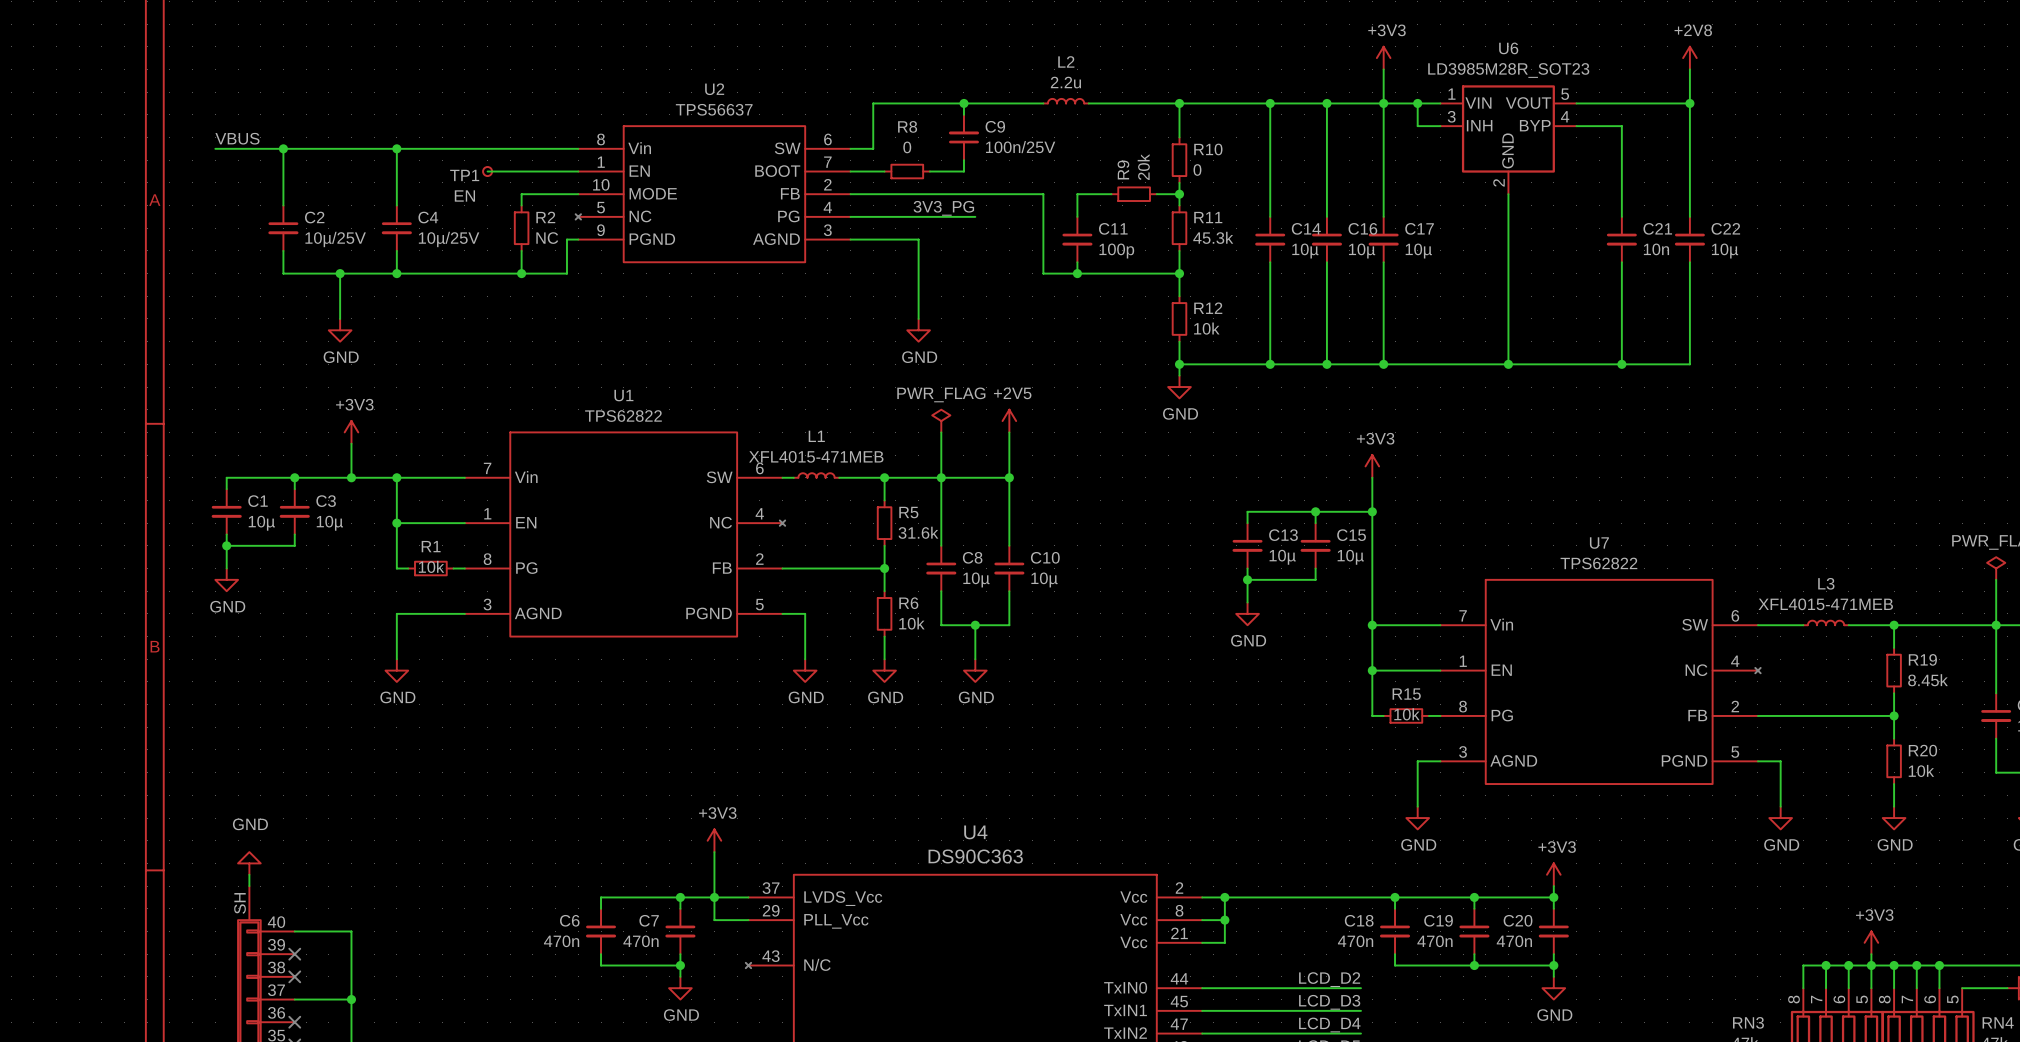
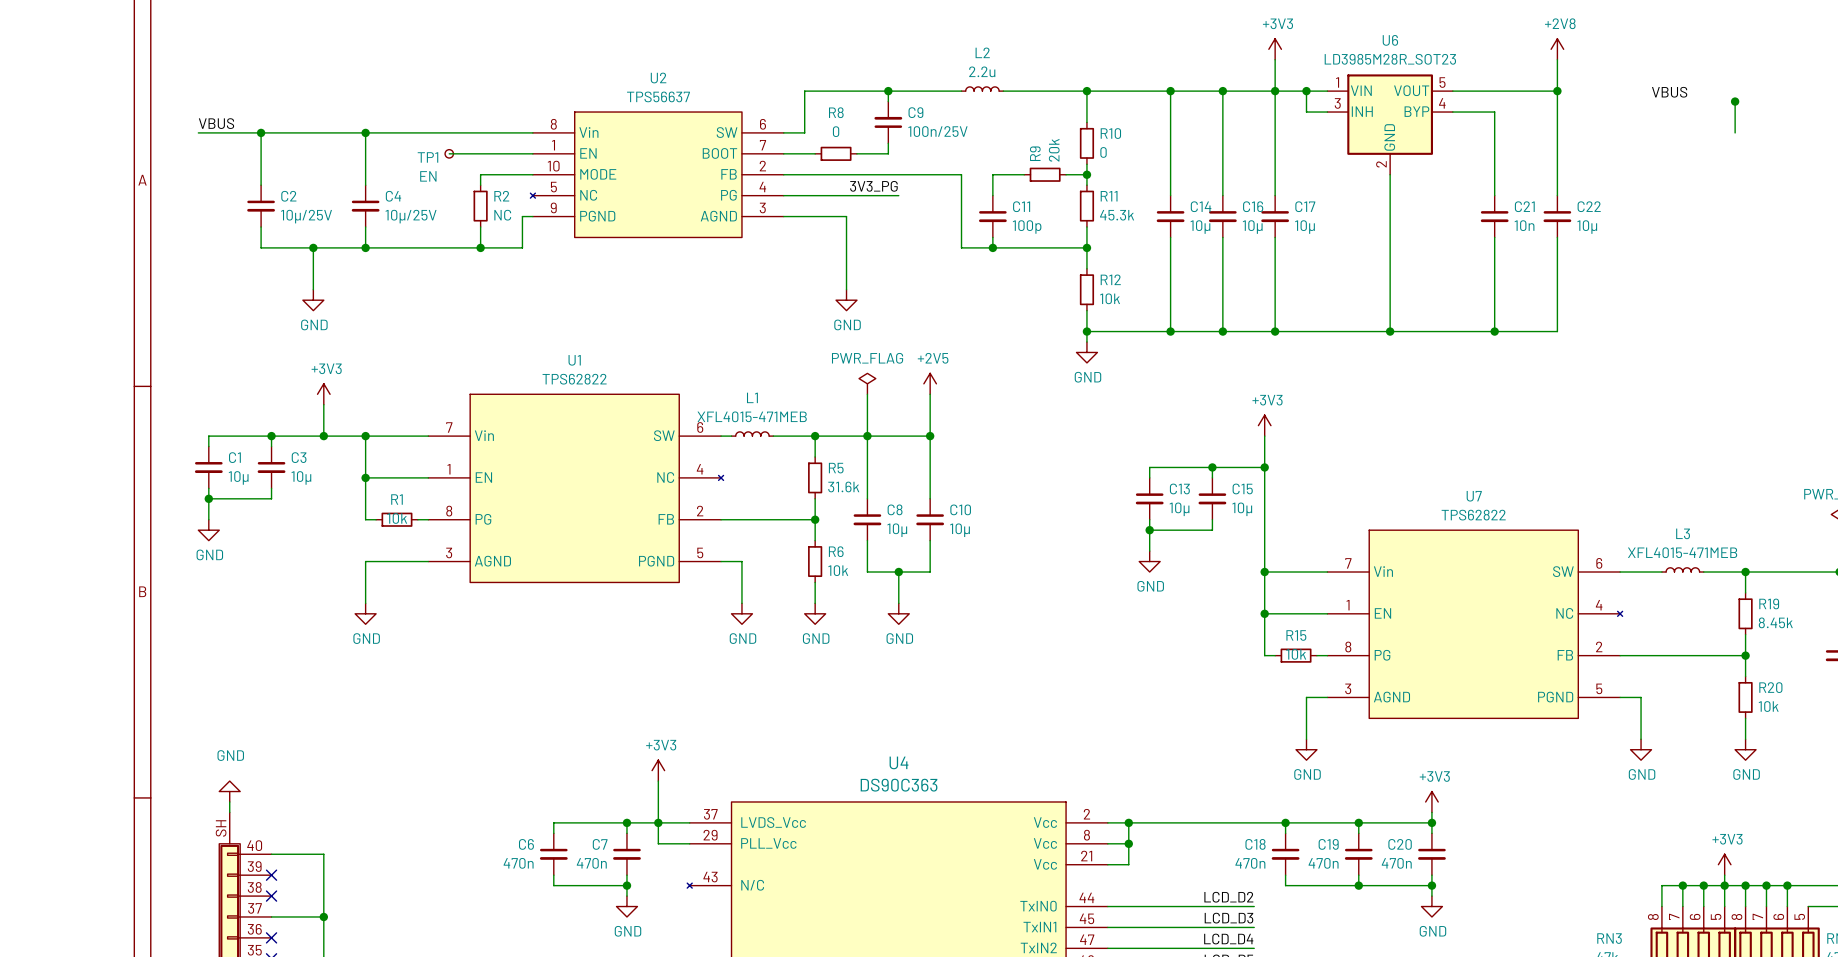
label: none -> VBUS (1669, 92)
wire: none -> (1735, 101) (1735, 132)
junction: none -> (1735, 101)

